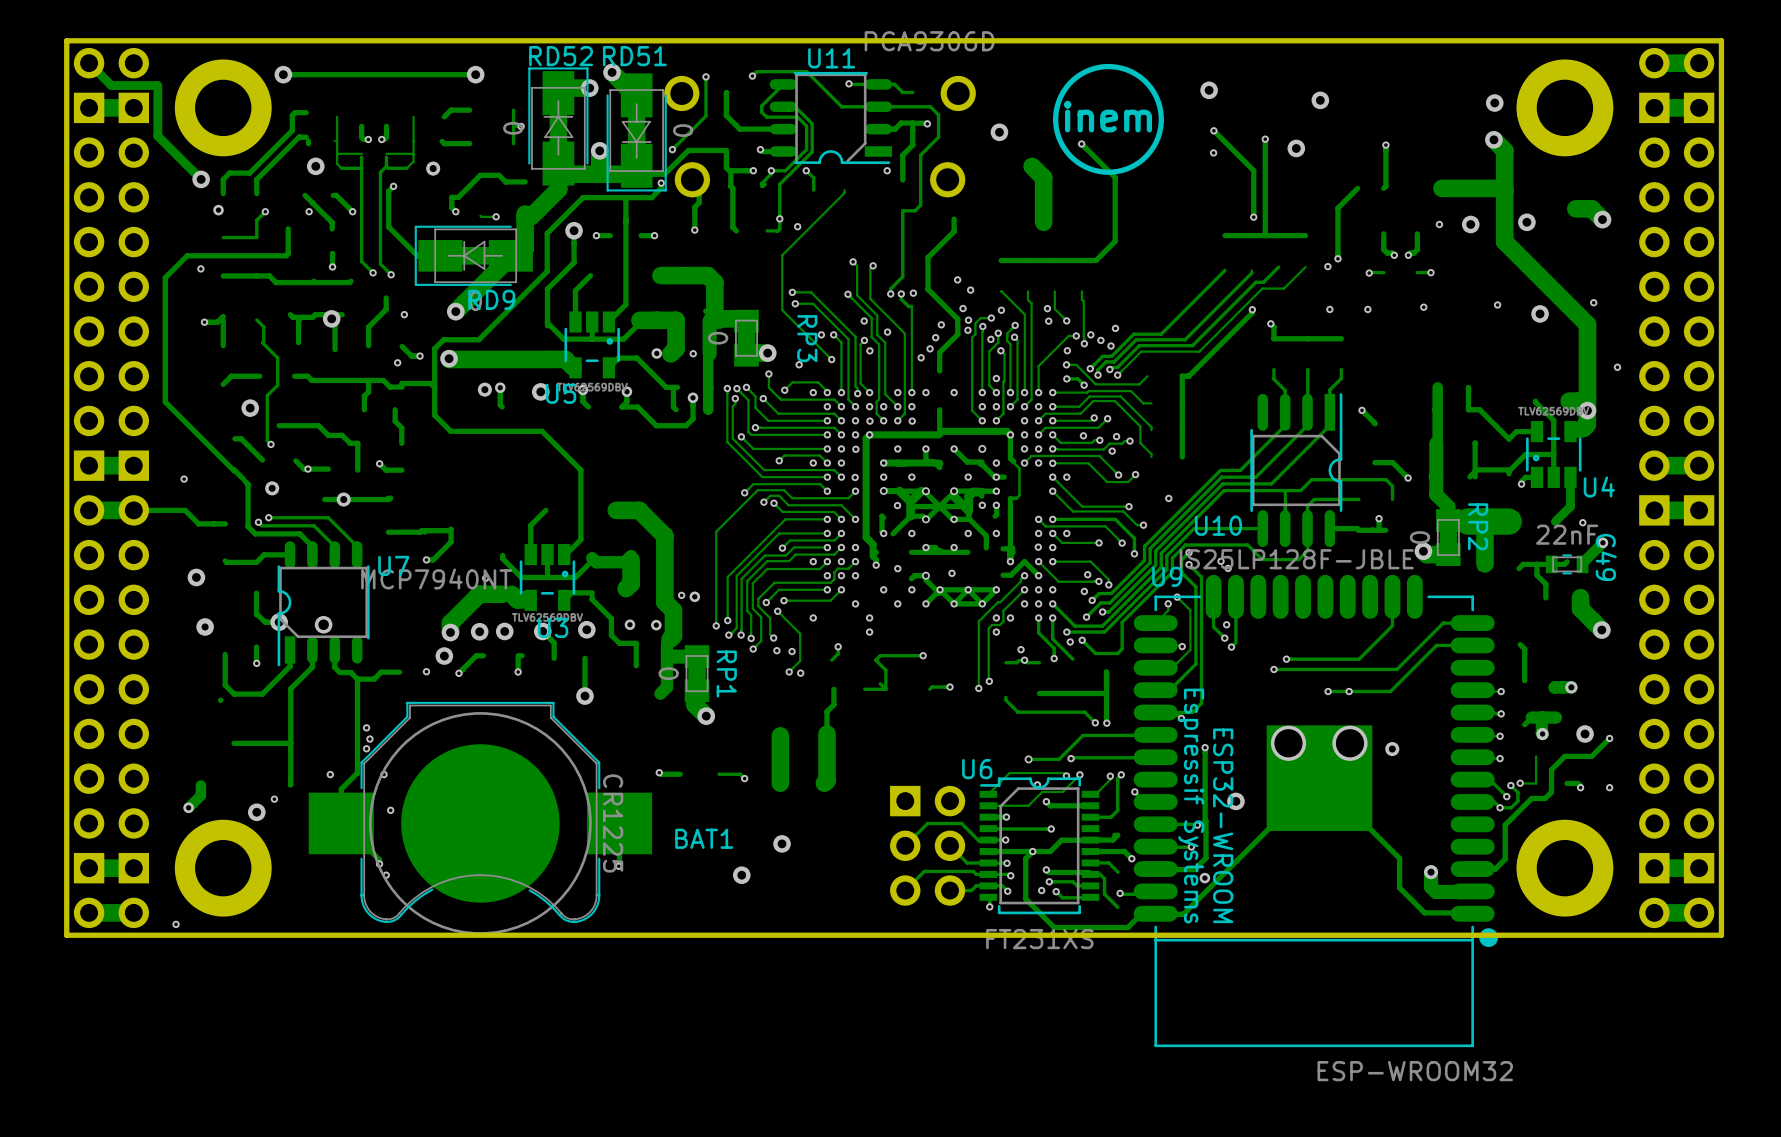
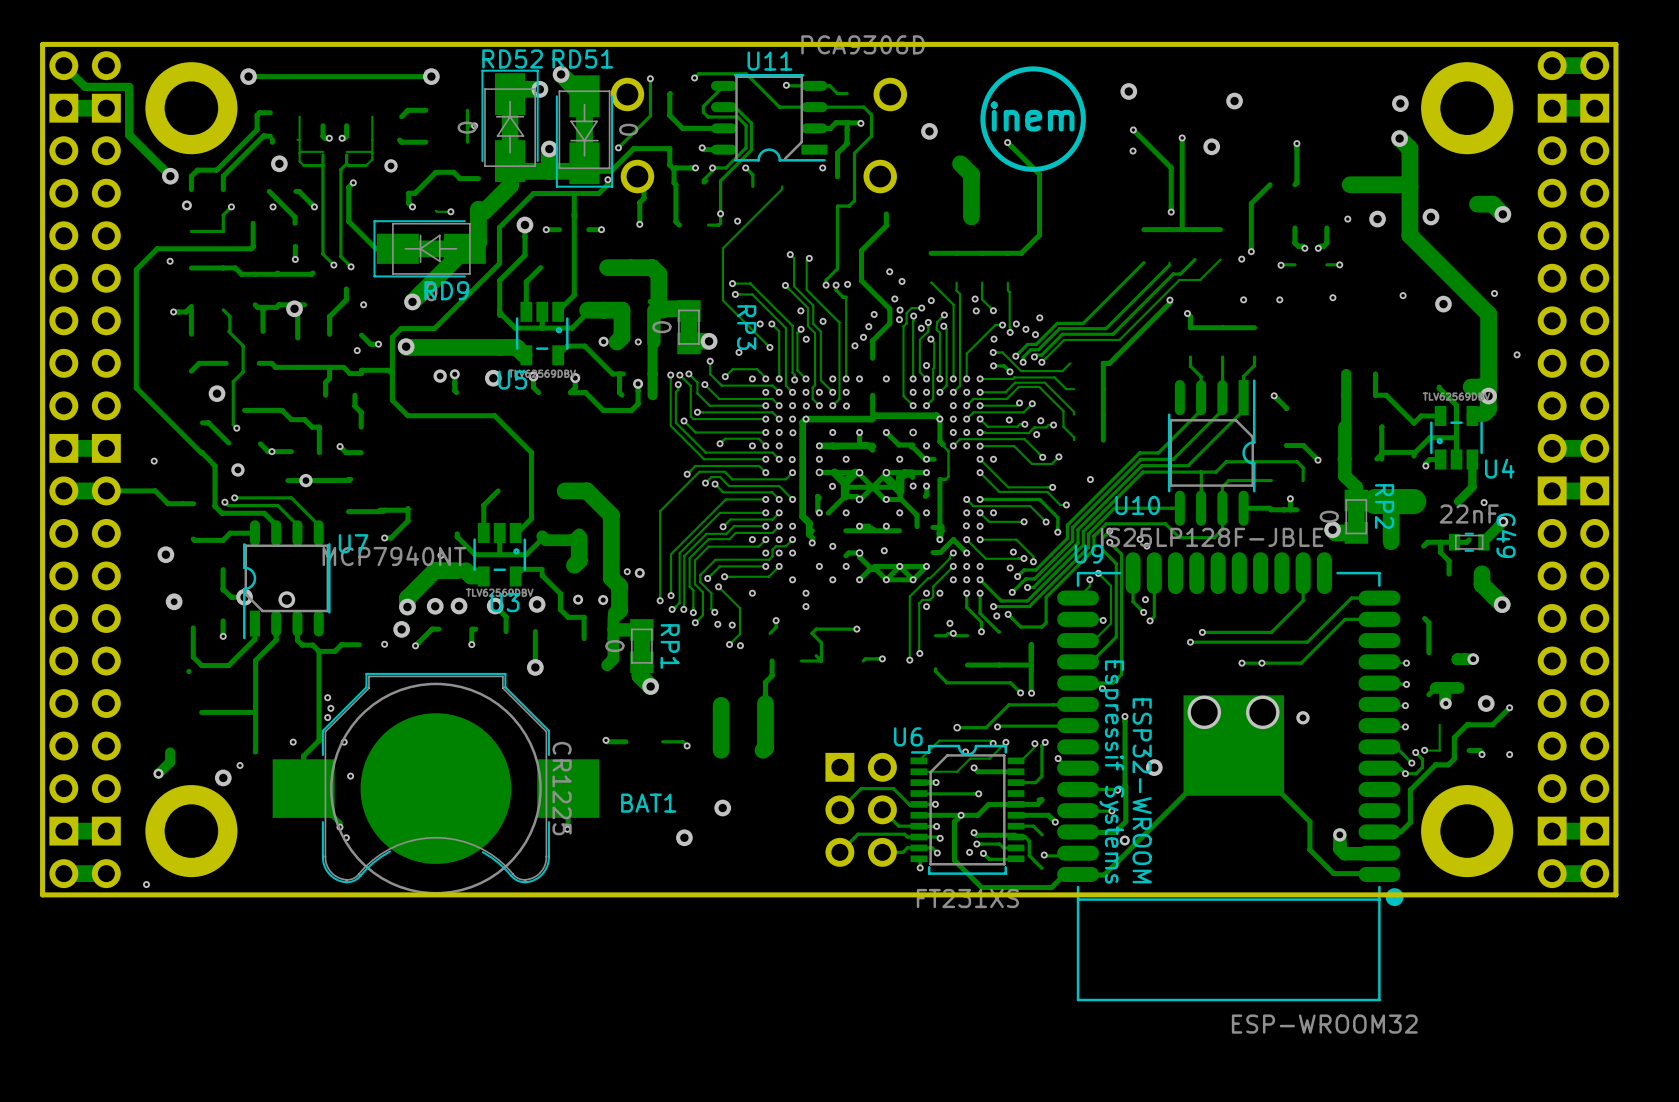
via: (940, 589) -> none

